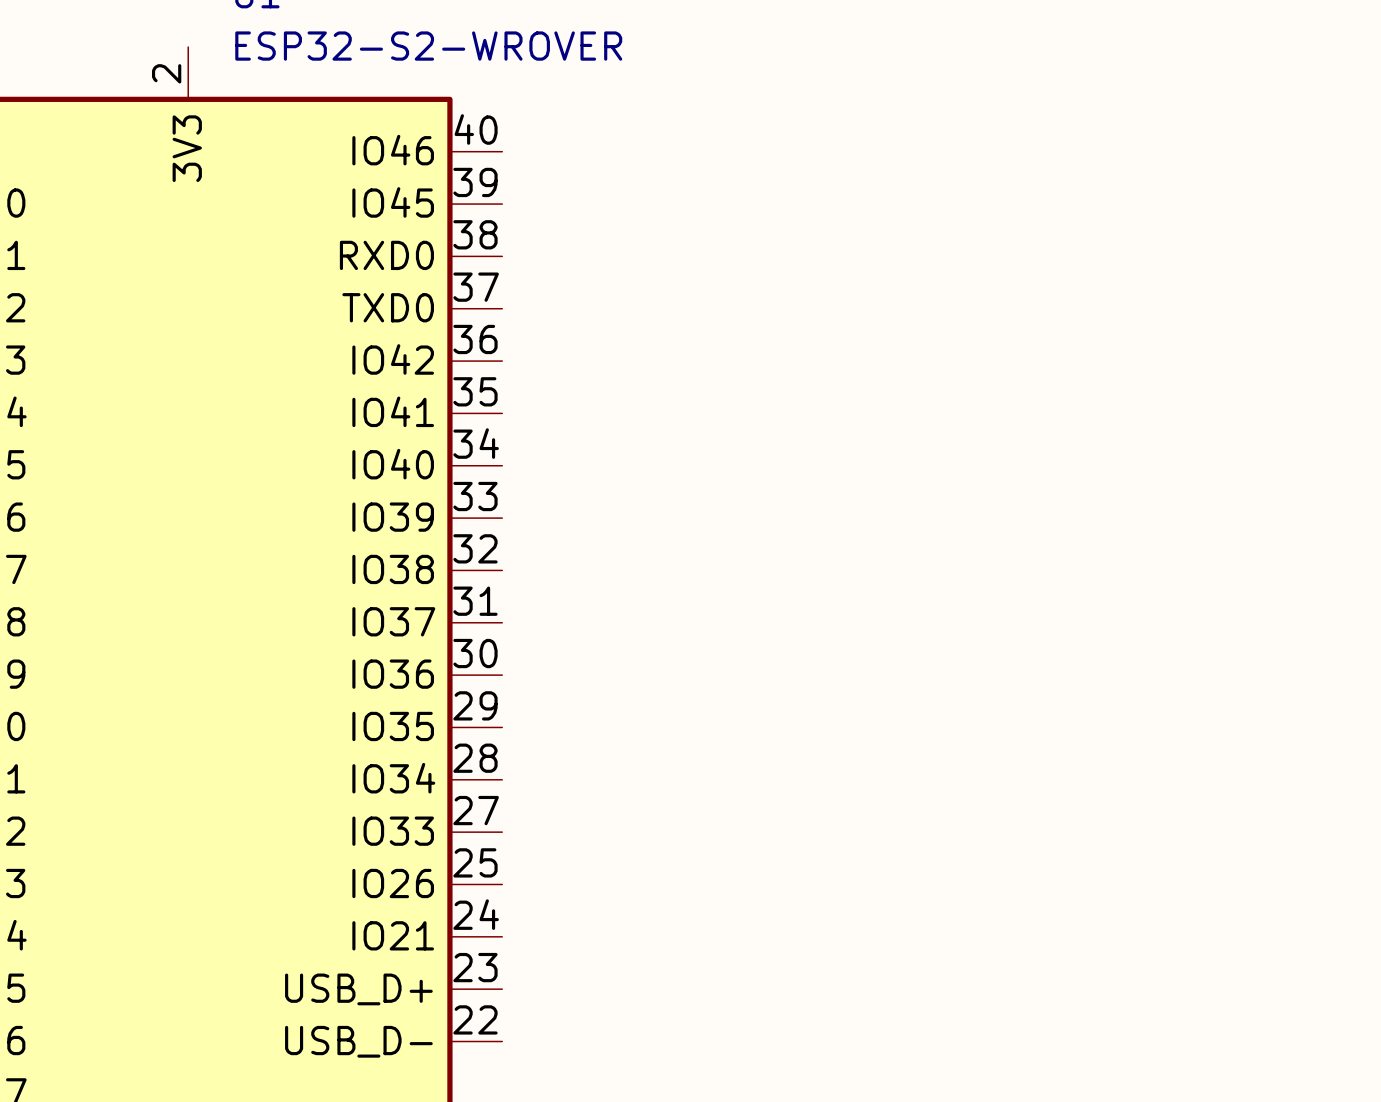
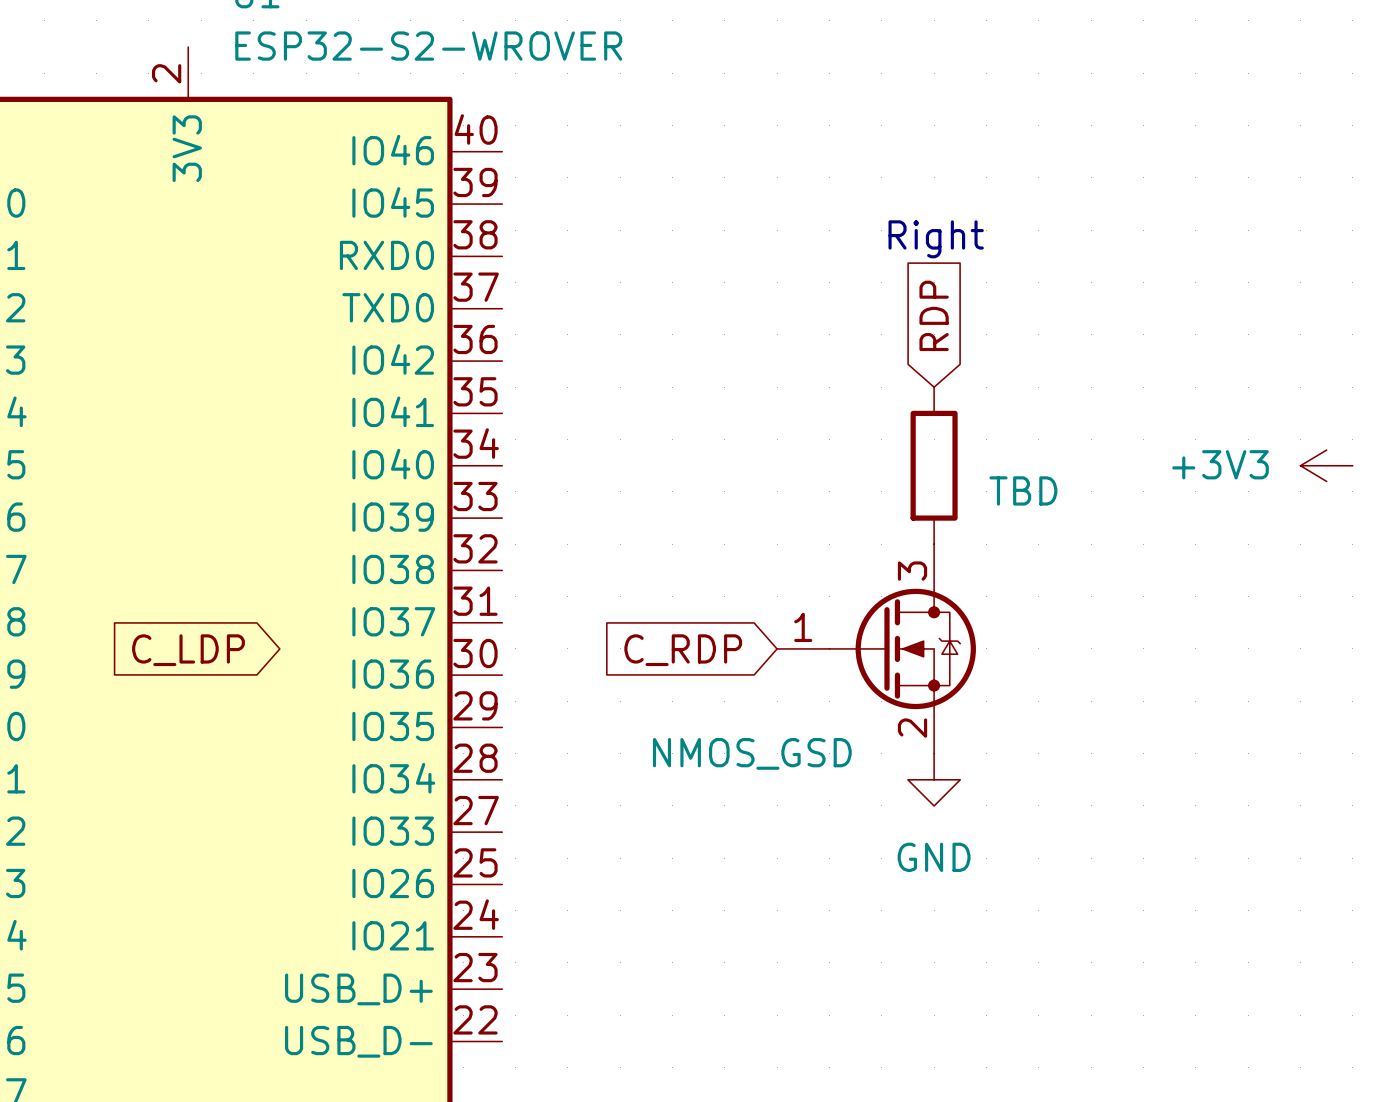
text: none -> Right (936, 239)
global label: none -> RDP (934, 315)
part: none -> TBD (934, 465)
power symbol: none -> +3V3 (1326, 465)
part: none -> NMOS_GSD (876, 648)
global label: none -> C_LDP (188, 650)
global label: none -> C_RDP (683, 650)
power symbol: none -> GND (934, 779)

